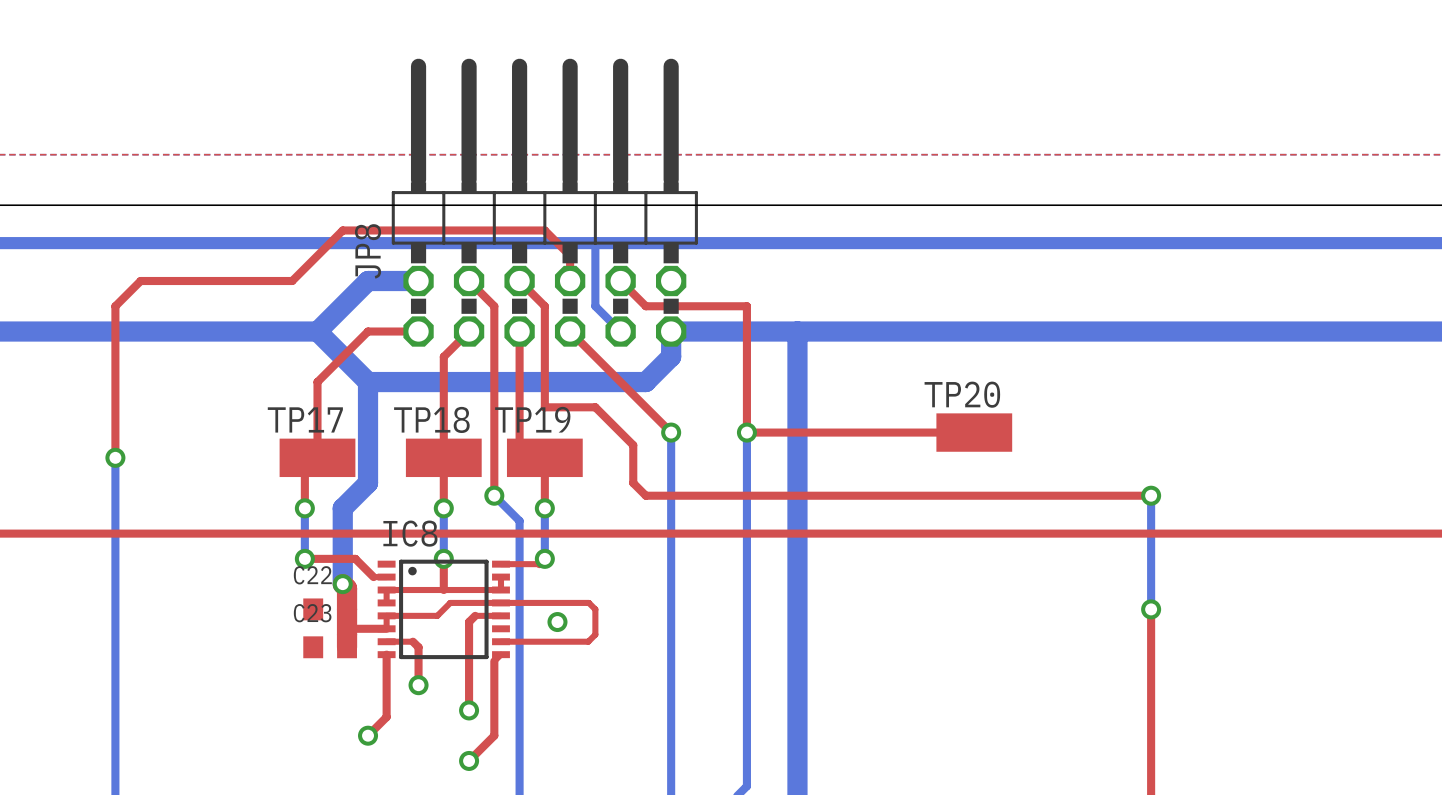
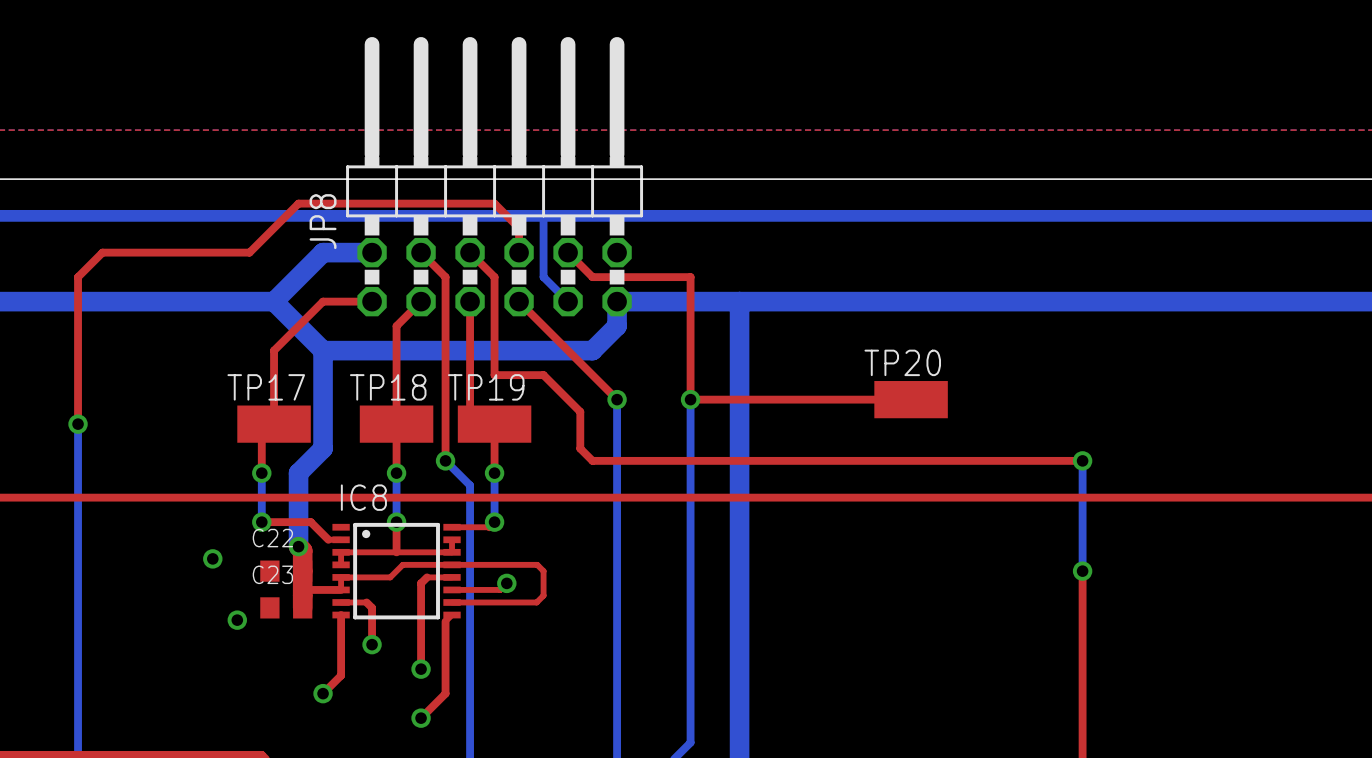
via: none -> (212, 558)
top track: none -> (506, 583) (500, 589) (452, 589)
via: none -> (237, 620)

